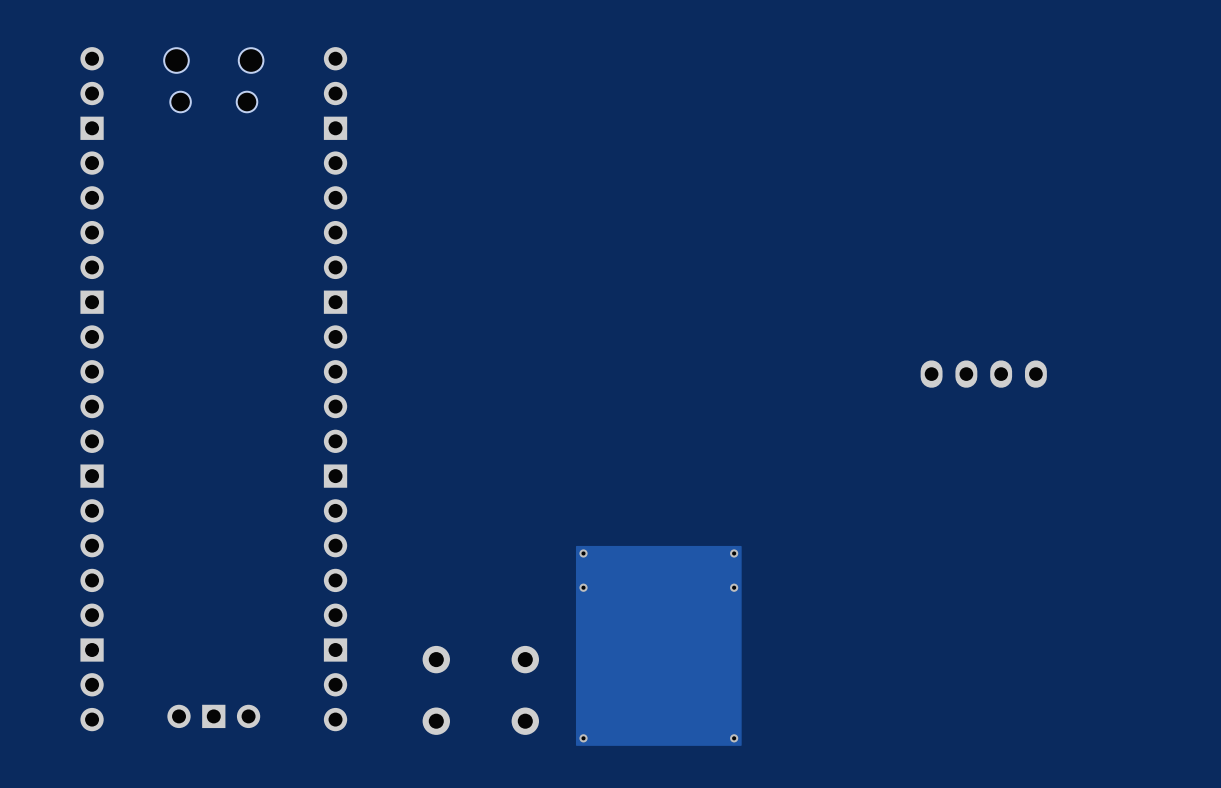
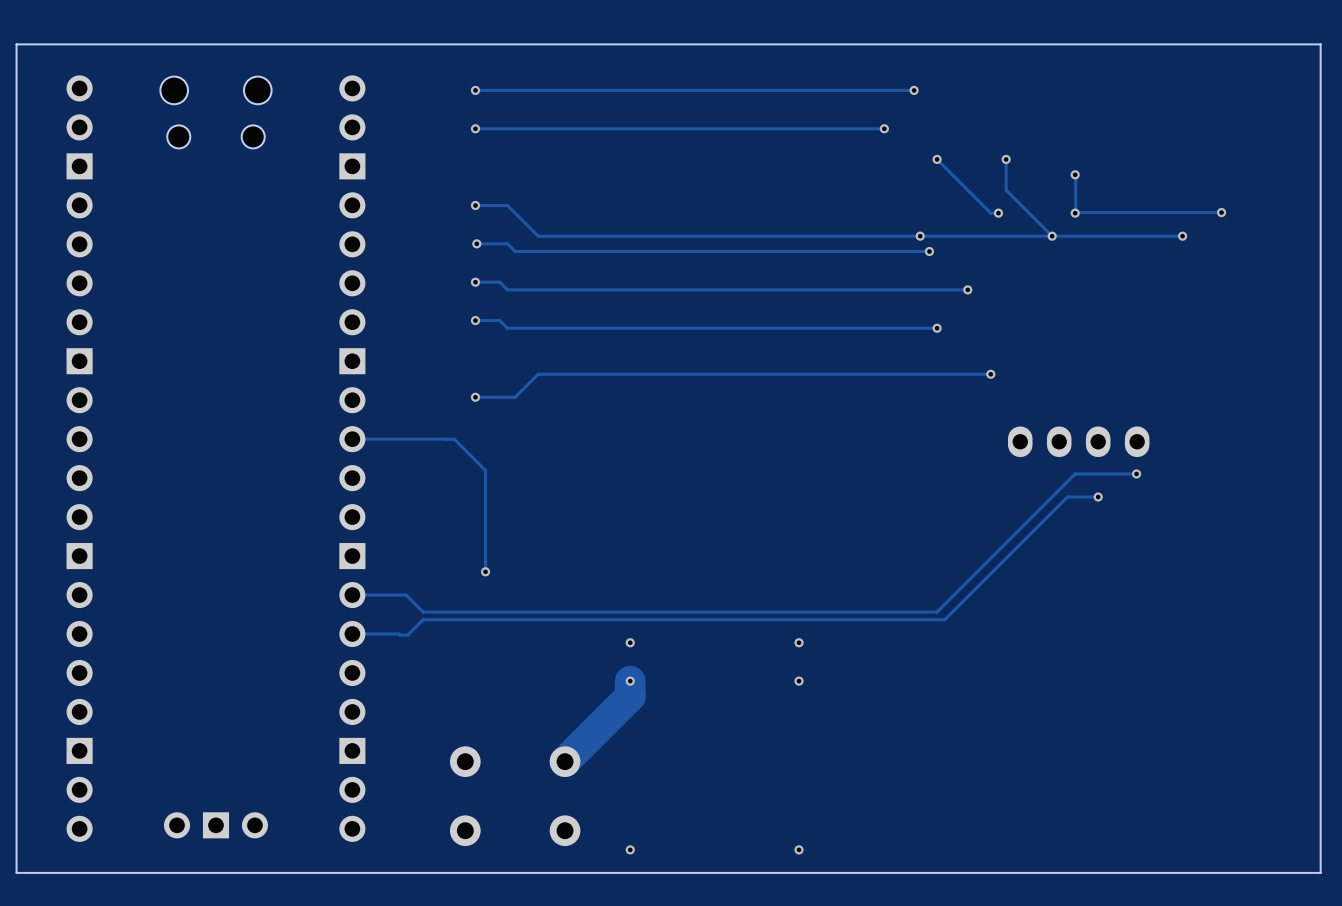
board edge: none -> (1320, 44) (16, 44) (16, 872) (1320, 872) (1320, 44)
via: none -> (475, 90)
track: none -> (914, 90) (475, 90)
via: none -> (914, 90)
via: none -> (475, 128)
track: none -> (884, 128) (475, 128)
via: none -> (884, 128)
track: none -> (937, 159) (990, 213) (998, 213)
via: none -> (937, 159)
track: none -> (1006, 159) (1006, 190) (1052, 236)
via: none -> (1006, 159)
track: none -> (1075, 174) (1075, 212)
via: none -> (1075, 174)
track: none -> (475, 205) (507, 205) (538, 236) (1182, 236)
via: none -> (475, 205)
track: none -> (1221, 212) (1075, 212)
via: none -> (1221, 212)
via: none -> (998, 213)
via: none -> (1075, 213)
via: none -> (920, 236)
via: none -> (1052, 236)
via: none -> (1182, 236)
track: none -> (476, 243) (507, 243) (515, 251) (929, 251)
via: none -> (476, 243)
via: none -> (929, 251)
track: none -> (475, 282) (499, 282) (507, 289) (967, 289)
via: none -> (475, 282)
via: none -> (967, 289)
track: none -> (475, 320) (499, 320) (507, 328) (937, 328)
via: none -> (475, 320)
via: none -> (937, 328)
track: none -> (990, 374) (538, 374) (515, 397) (475, 397)
via: none -> (990, 374)
via: none -> (475, 397)
track: none -> (446, 439) (352, 439)
track: none -> (446, 439) (454, 439) (485, 470) (485, 571)
track: none -> (1136, 473) (1075, 473) (937, 612) (423, 612) (406, 595) (352, 595)
via: none -> (1136, 473)
track: none -> (1098, 497) (1067, 497) (944, 619) (423, 619) (407, 635) (352, 634)
via: none -> (1098, 497)
via: none -> (485, 571)
drawing: [575, 545, 742, 746] -> none
track: none -> (630, 681) (630, 696) (565, 761)

